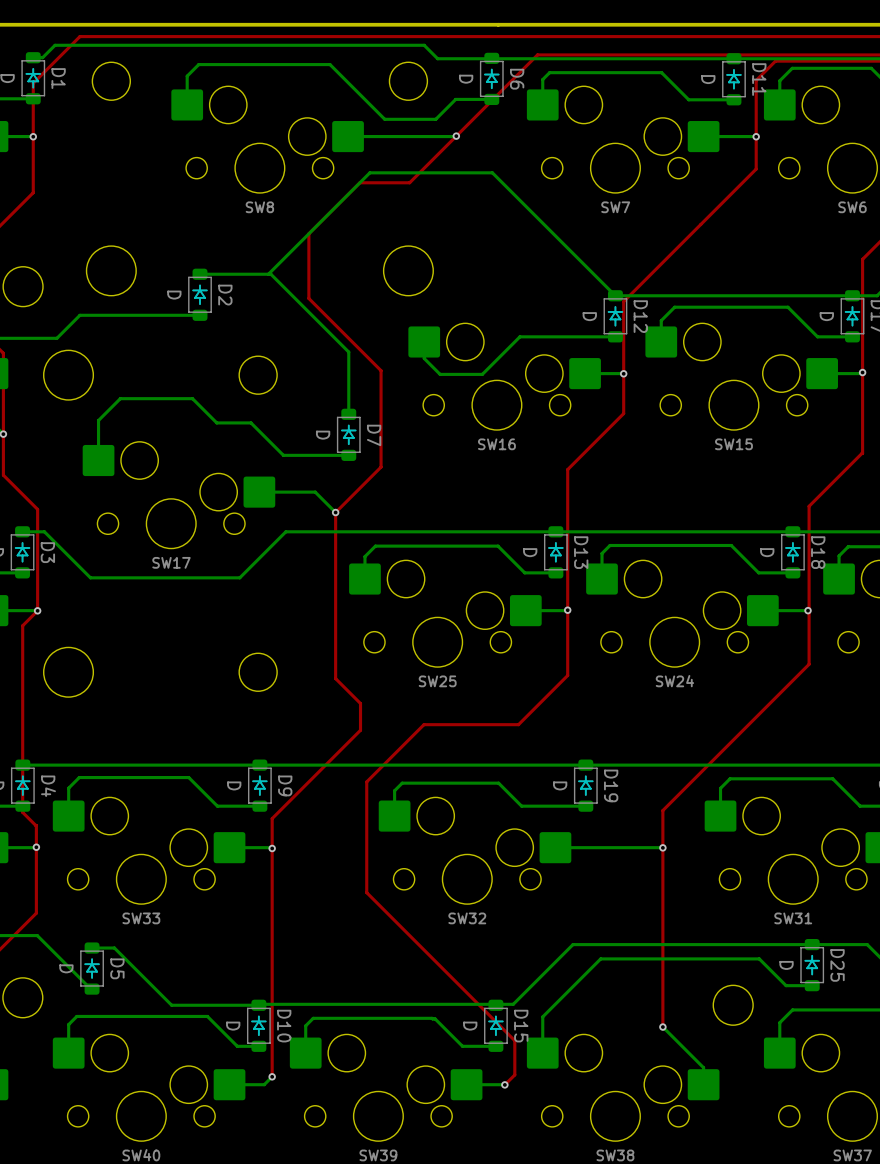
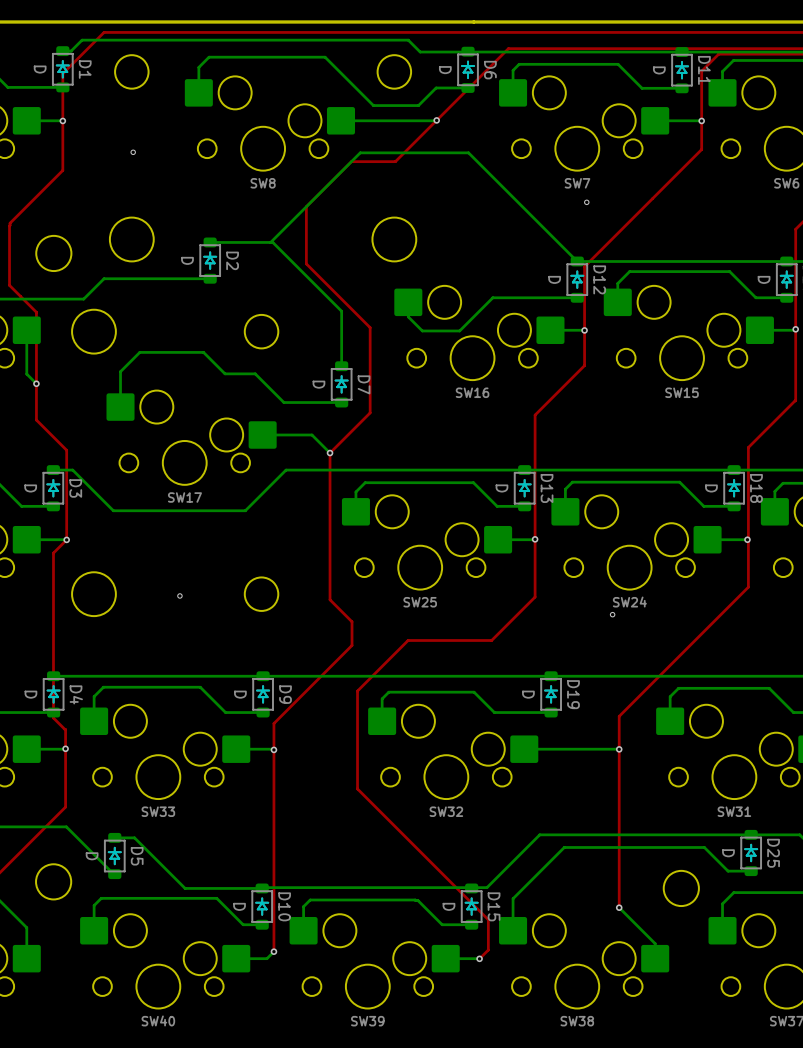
via: none -> (133, 152)
via: none -> (586, 202)
via: none -> (179, 595)
via: none -> (612, 614)

